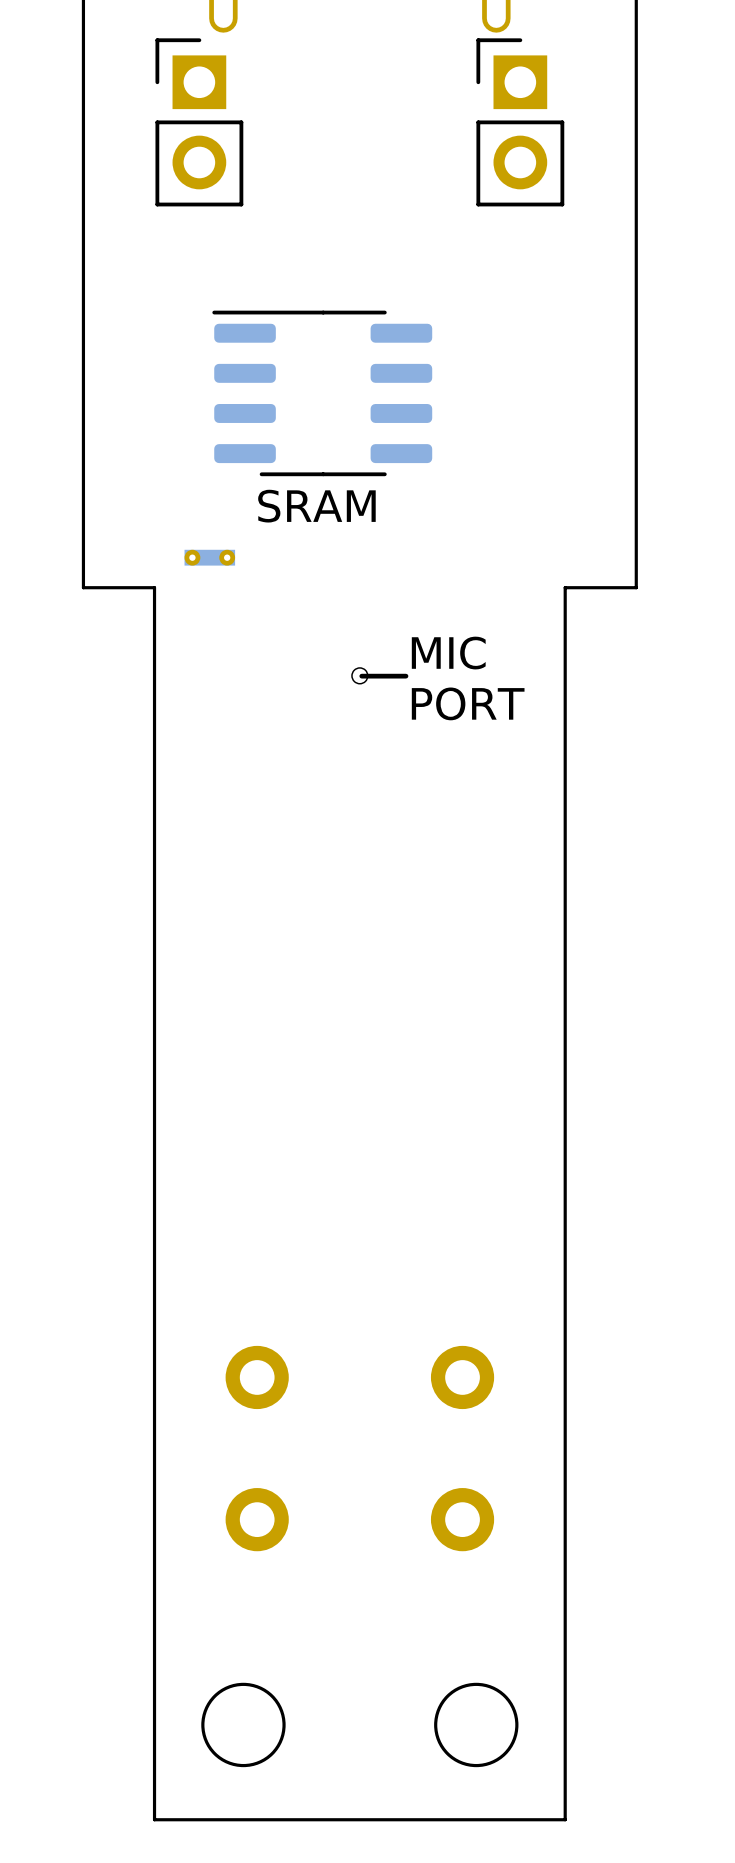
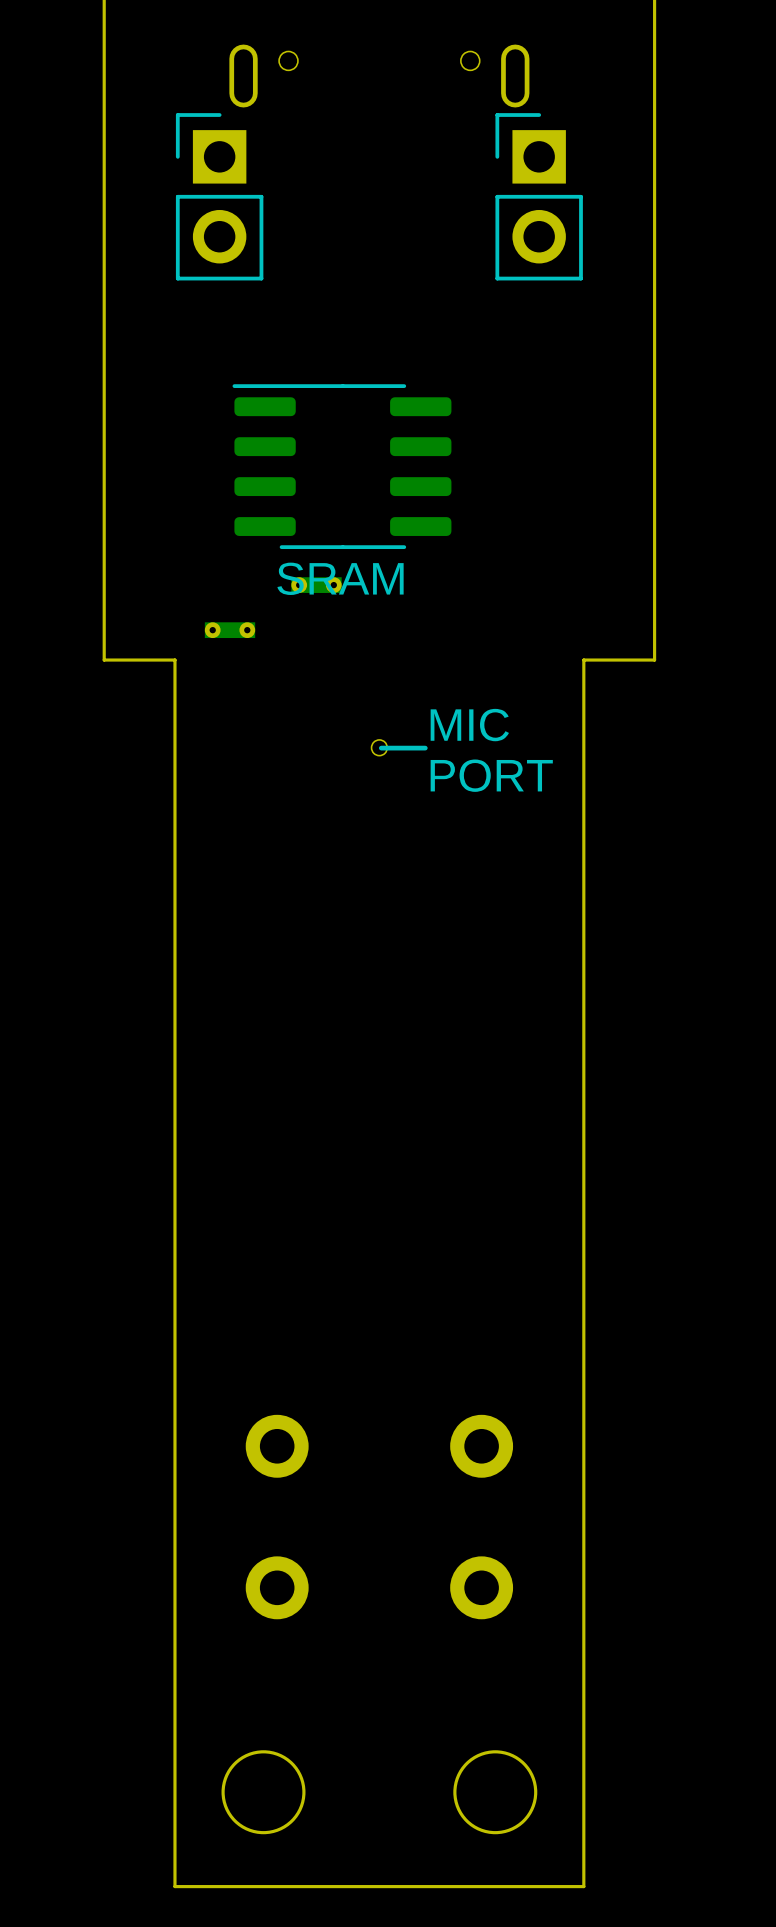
part: none -> (316, 585)

